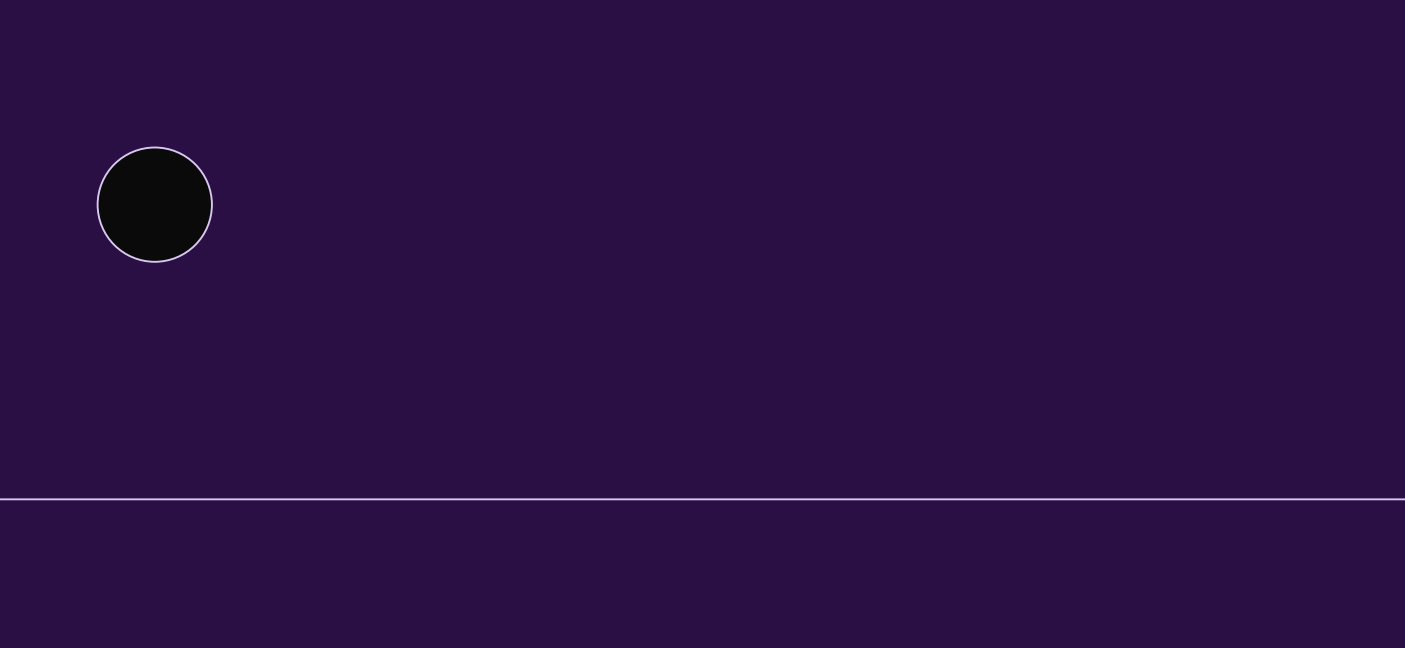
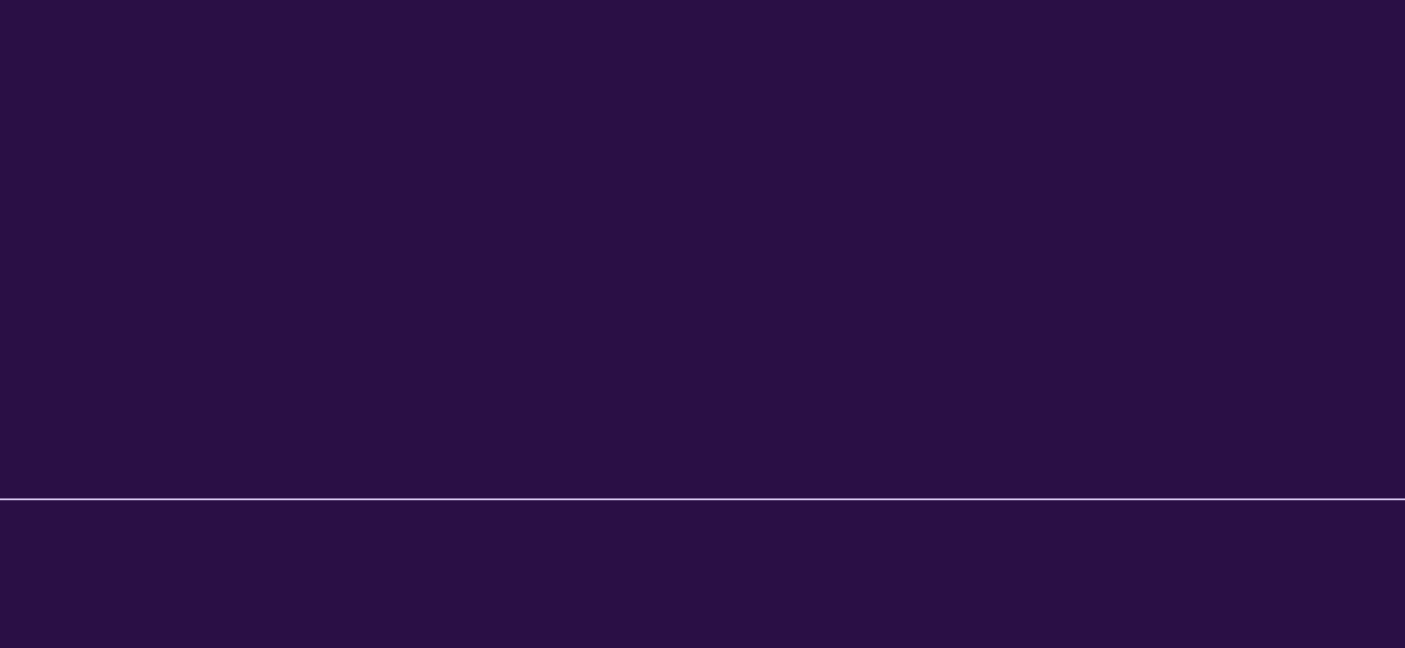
part: (154, 204) -> none

